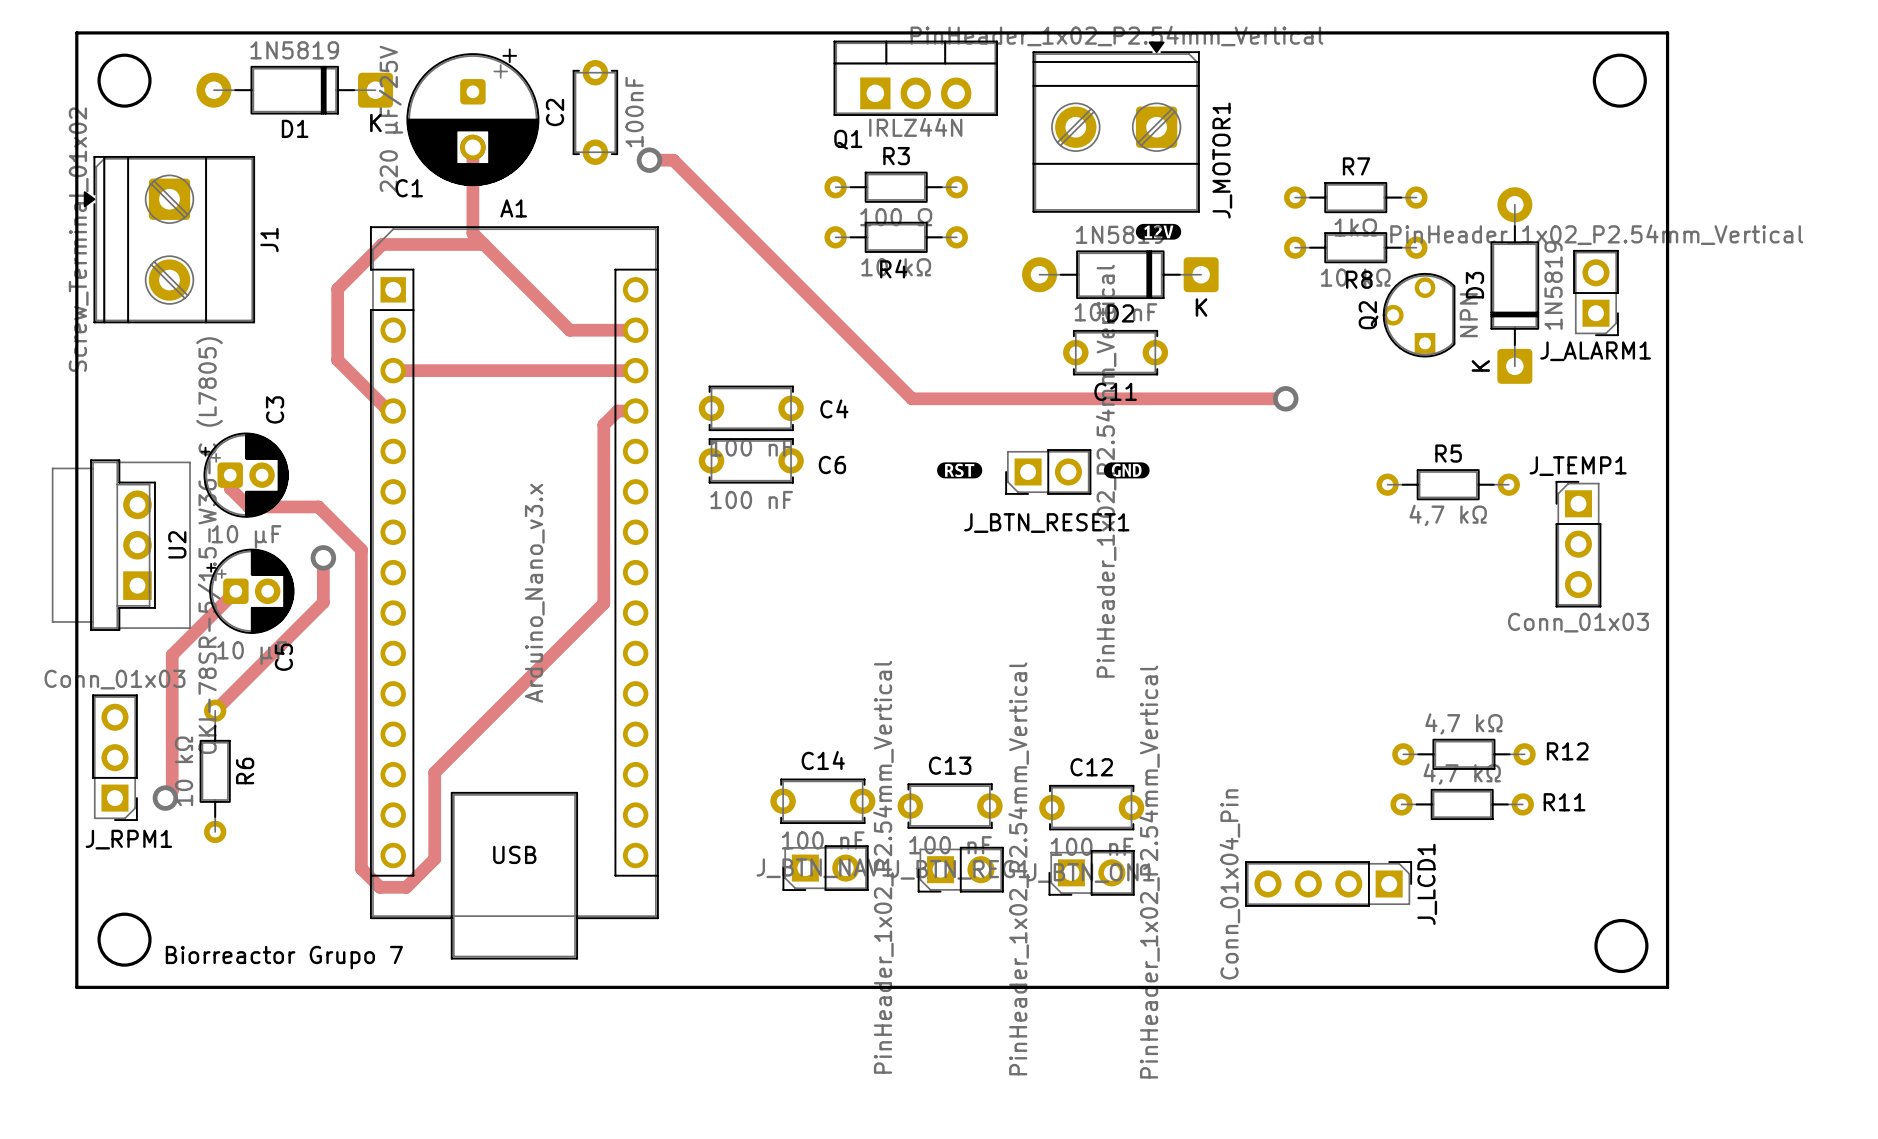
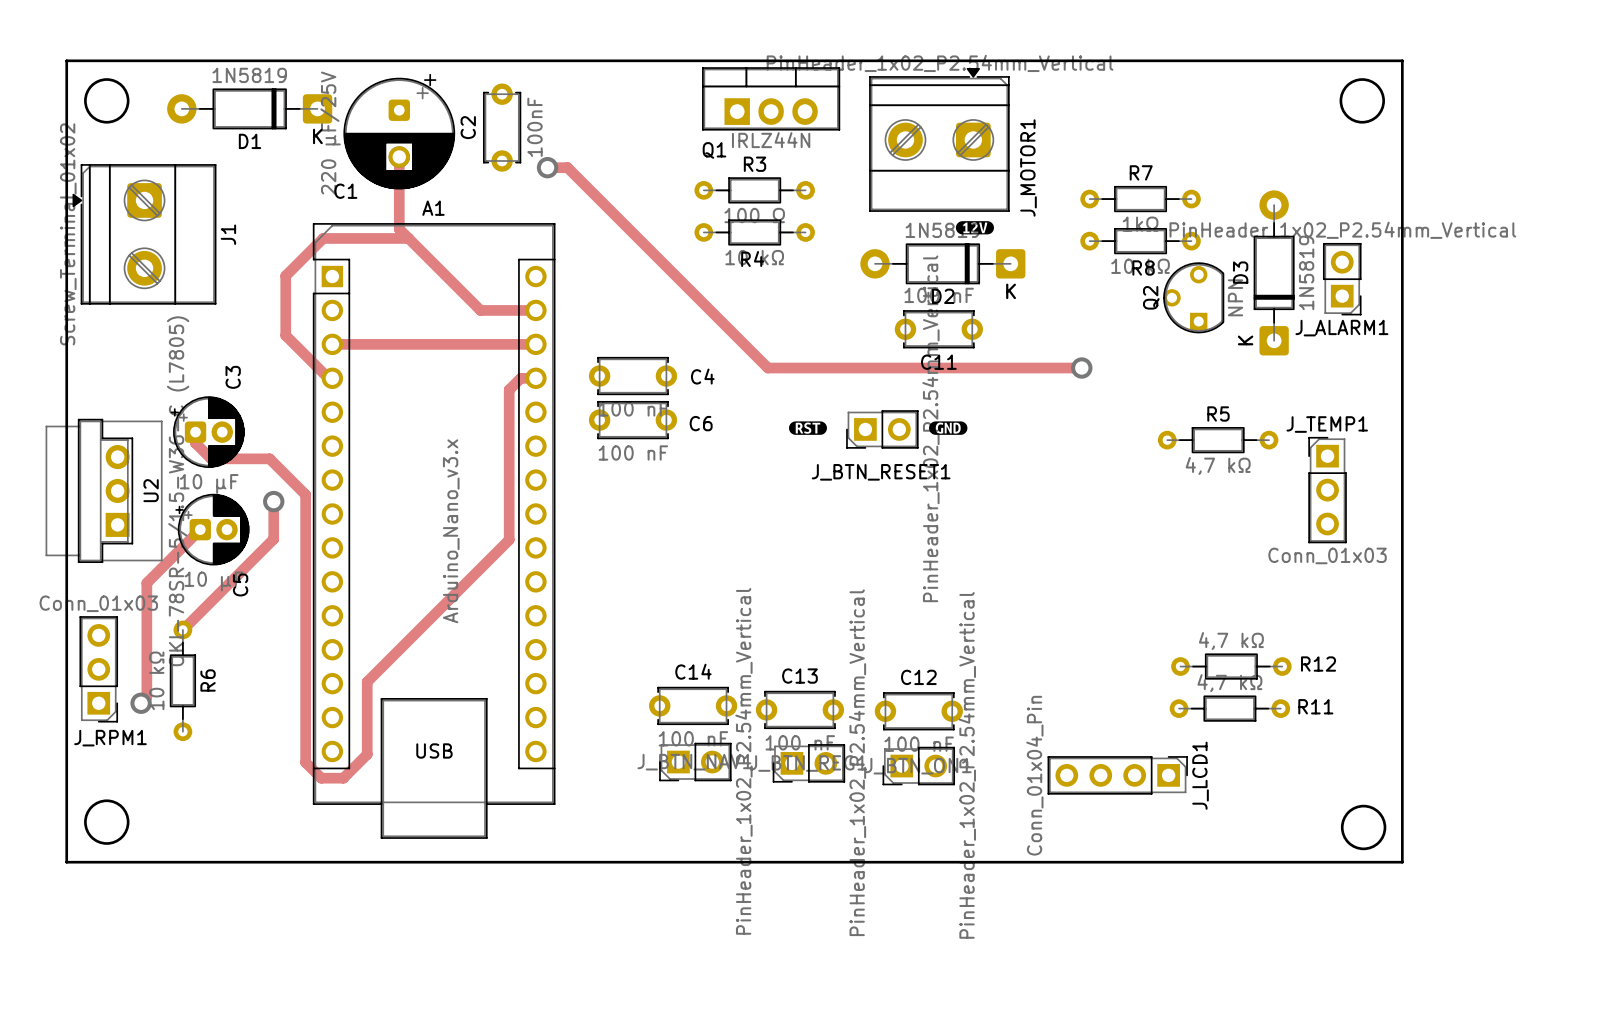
text: Biorreactor Grupo 7 (284, 957) -> none

